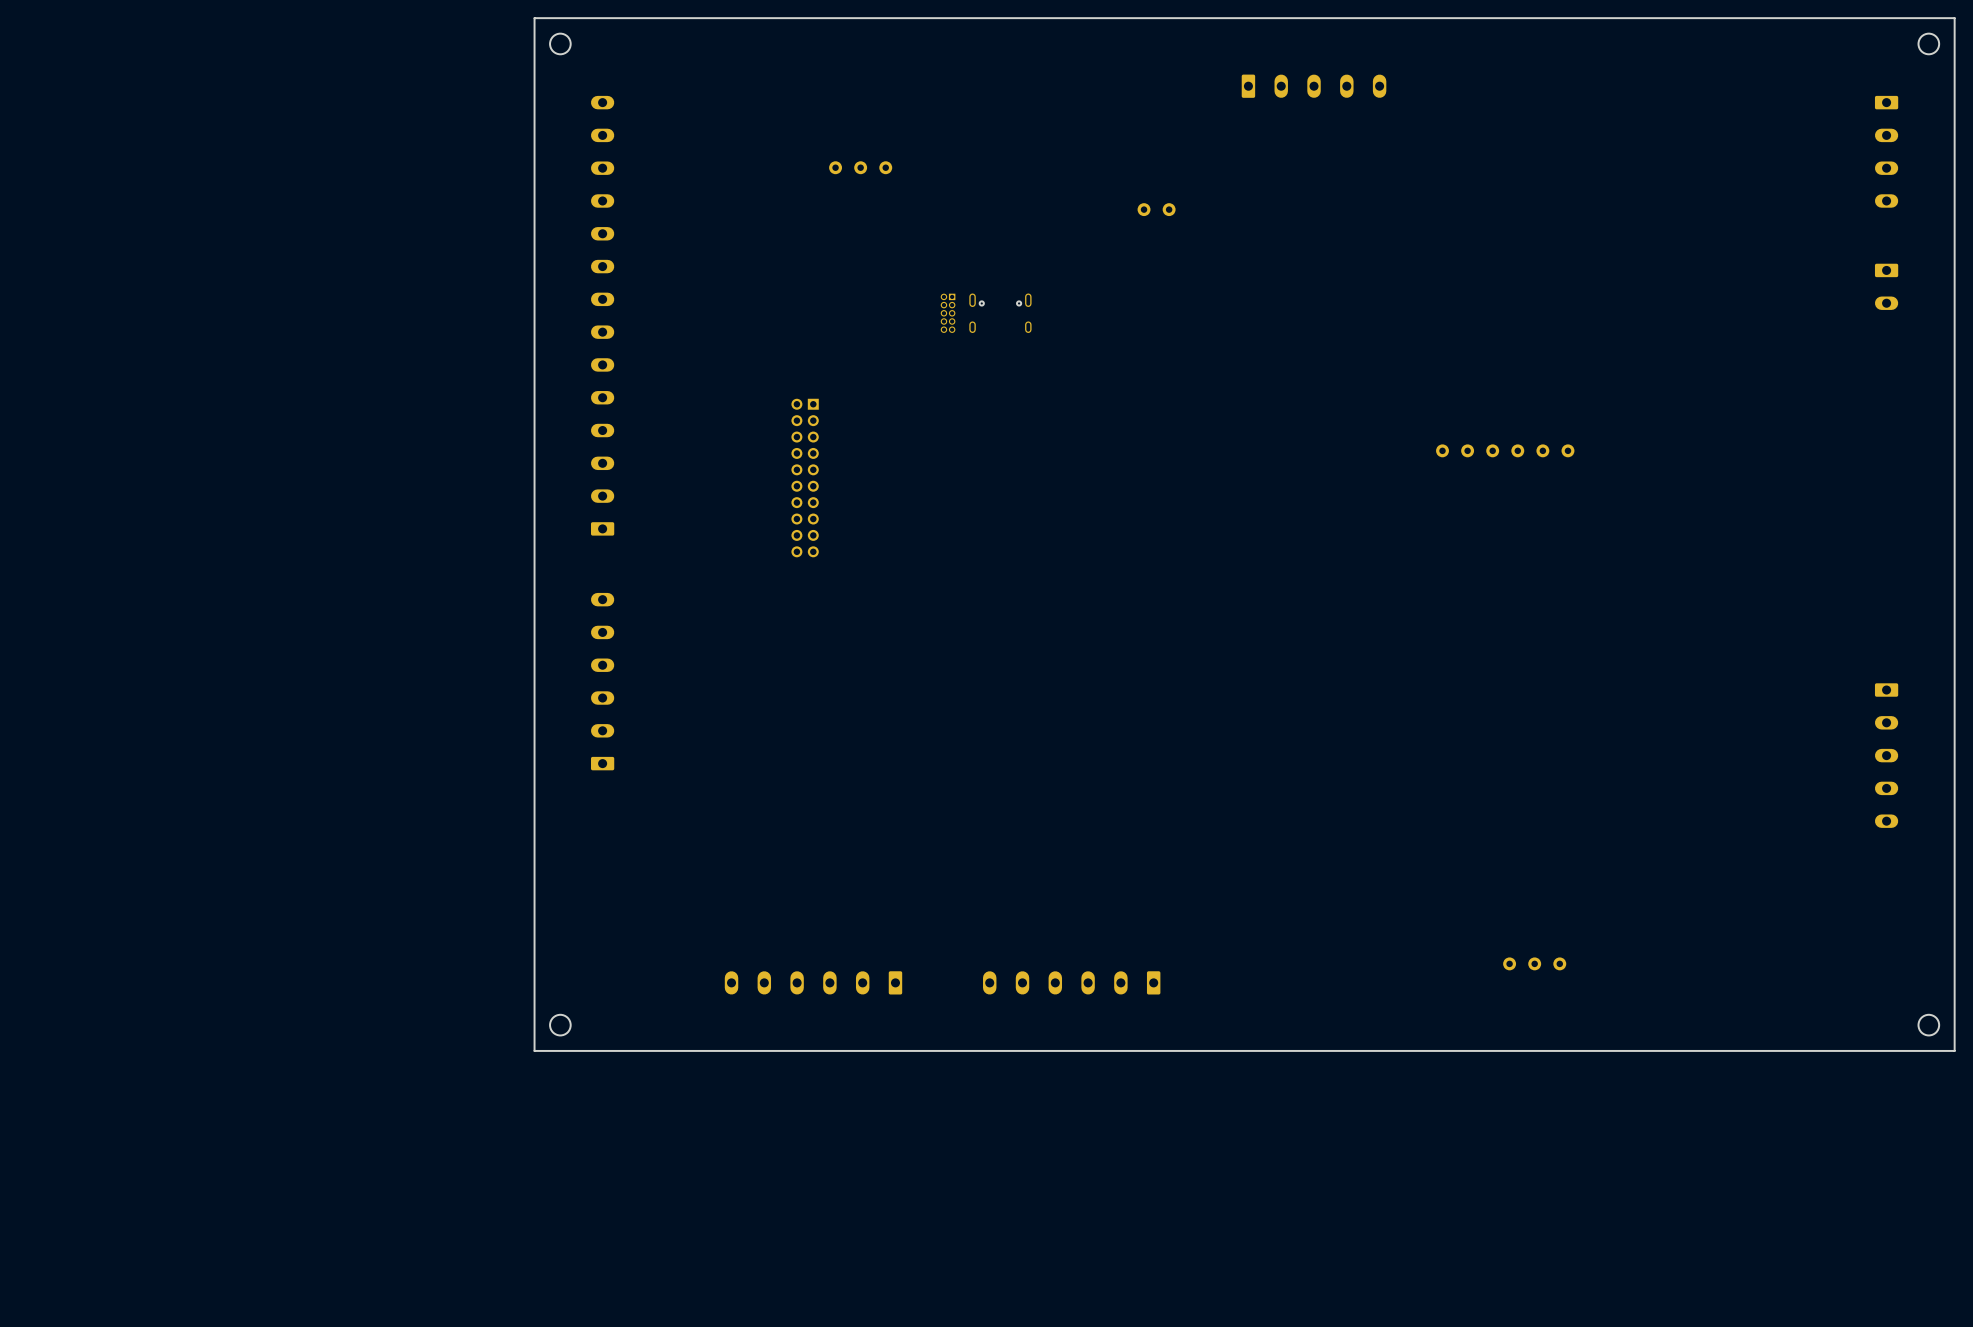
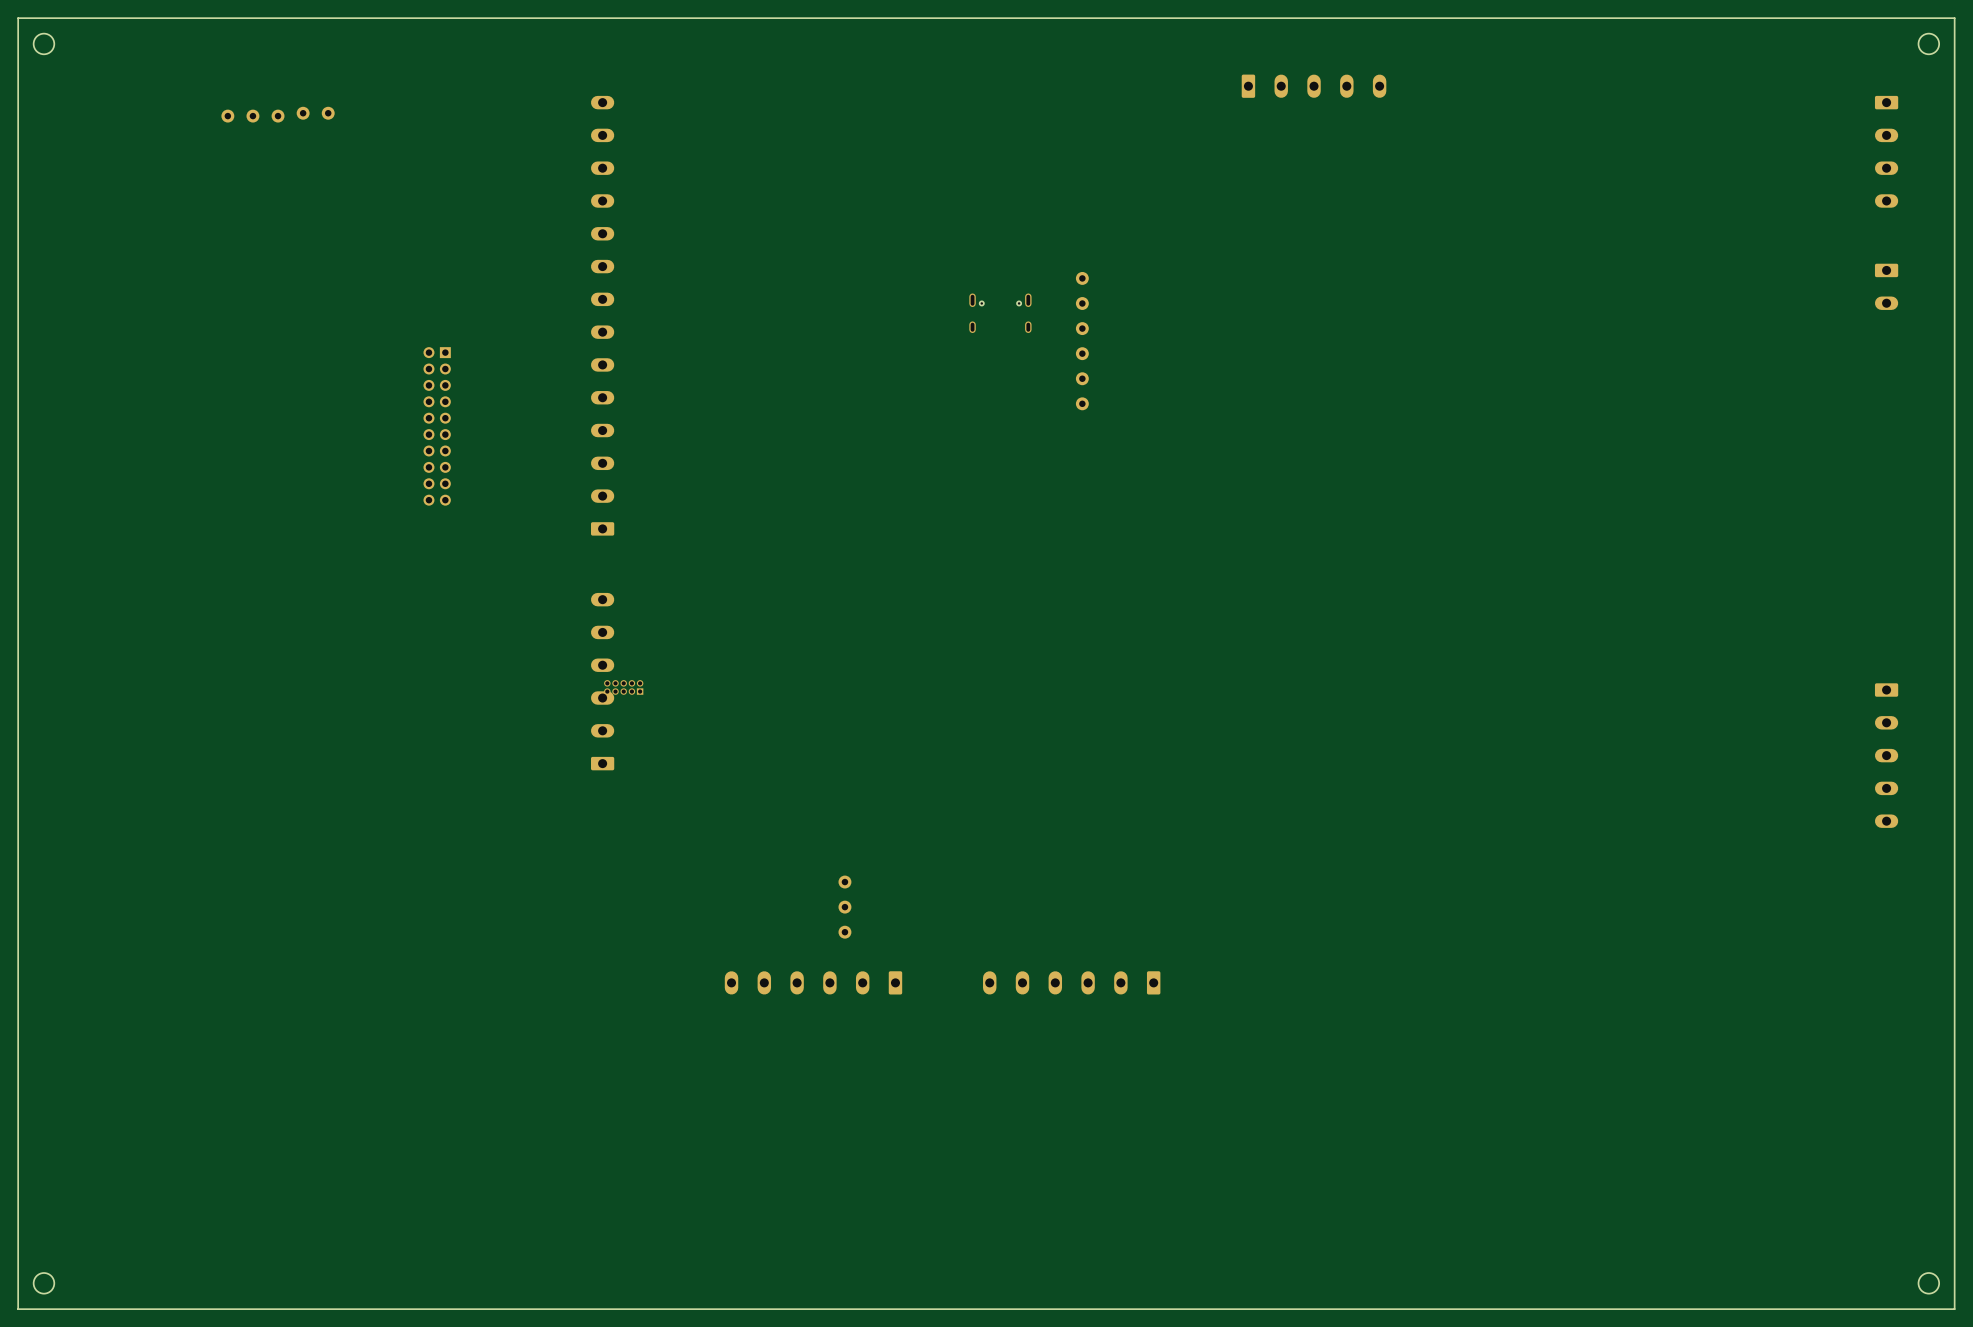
board edge: (534, 18) (534, 1050) (1954, 1050) -> (534, 18) (18, 18) (18, 1309) (1954, 1309) (1954, 1050)
round board edge: none -> [33, 33, 55, 55]
round board edge: [549, 33, 572, 55] -> none
part: none -> (303, 113)
part: none -> (328, 113)
part: none -> (227, 116)
part: none -> (252, 116)
part: none -> (278, 116)
part: (835, 167) -> none
part: (860, 167) -> none
part: (885, 167) -> none
part: (1144, 209) -> none
part: (1169, 209) -> none
part: none -> (1082, 278)
part: none -> (1082, 303)
part: (948, 313) -> none
part: none -> (1082, 328)
part: none -> (1082, 353)
part: none -> (1082, 378)
part: none -> (1082, 403)
part: none -> (437, 426)
part: (1442, 450) -> none
part: (1467, 450) -> none
part: (1492, 450) -> none
part: (1517, 450) -> none
part: (1542, 450) -> none
part: (1567, 450) -> none
part: (805, 478) -> none
part: none -> (623, 687)
part: none -> (844, 882)
part: none -> (844, 907)
part: none -> (844, 932)
part: (1509, 963) -> none
part: (1534, 963) -> none
part: (1559, 963) -> none
round board edge: [549, 1014, 572, 1036] -> none
round board edge: [1918, 1014, 1940, 1036] -> none
round board edge: none -> [33, 1272, 55, 1294]
round board edge: none -> [1918, 1272, 1940, 1294]

